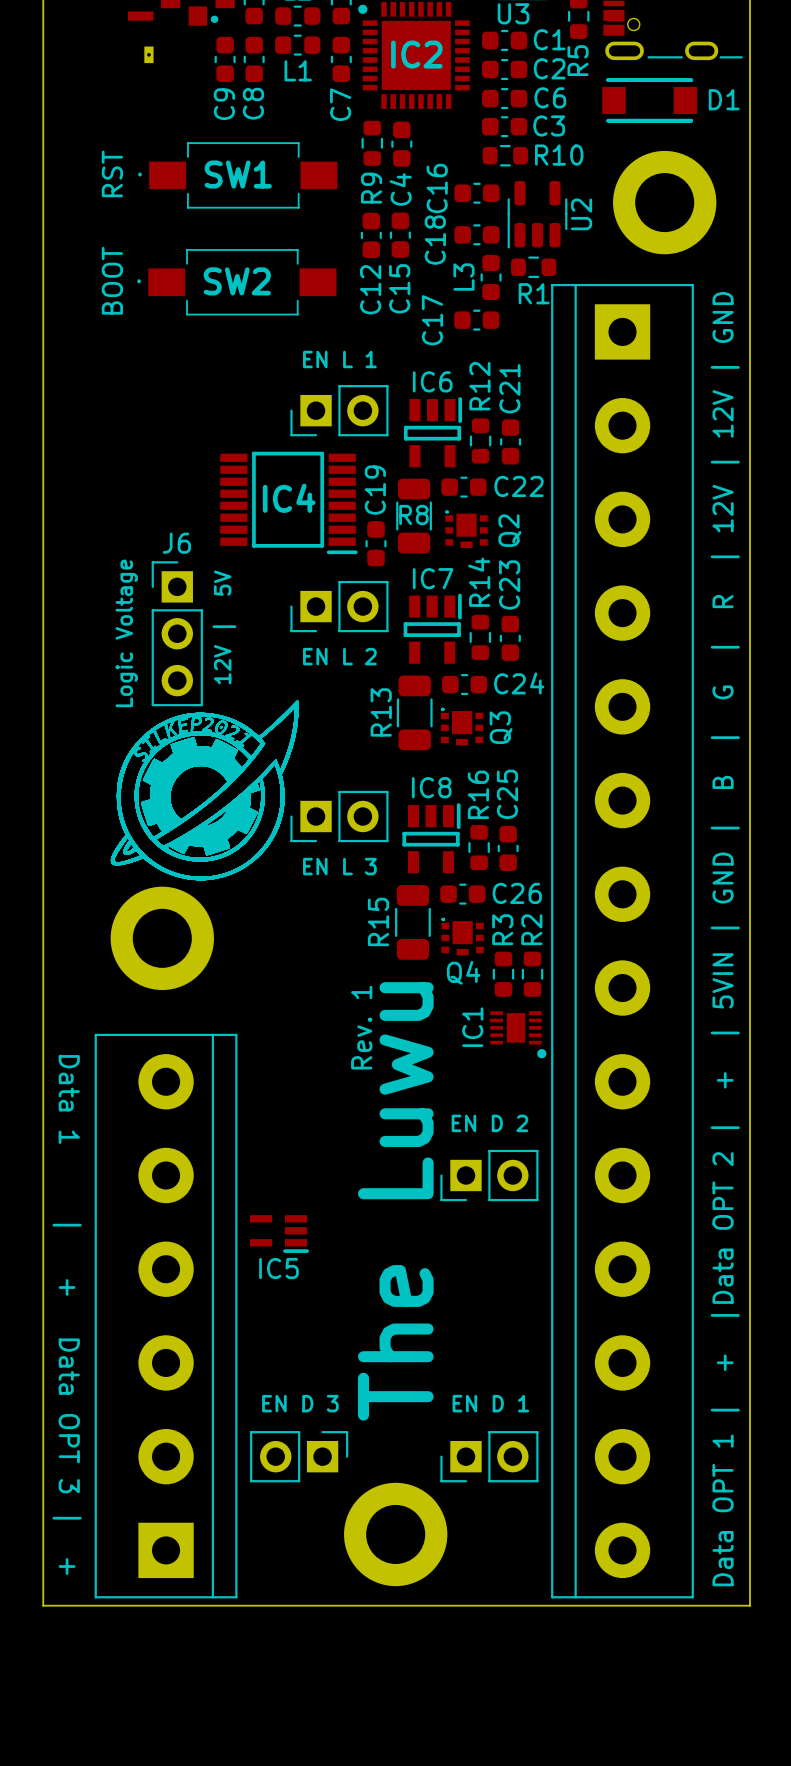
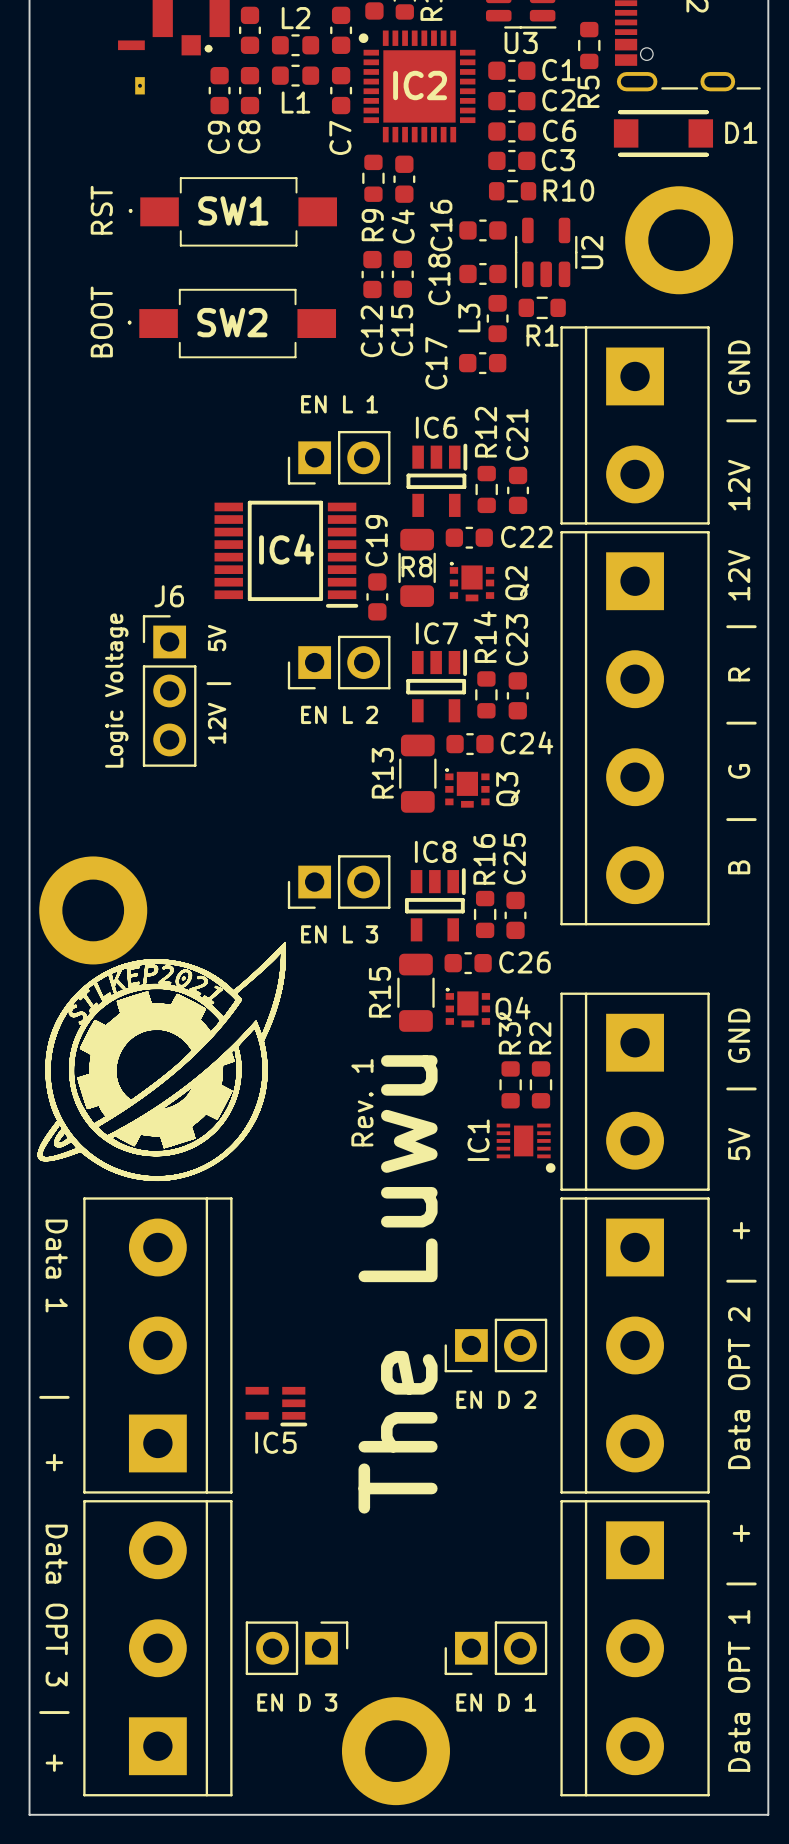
part: none -> (635, 425)
text: none -> 12V | GND (741, 425)
text: none -> B | G | R | 12V (741, 712)
part: none -> (635, 728)
drawing: [110, 699, 299, 881] -> none
drawing: none -> [37, 941, 286, 1182]
part position: (162, 938) -> (93, 910)
text: Data OPT 1 | + |Data OPT 2 | + | 5VIN | GND | B | G | R | 12V | 12V | GND (725, 939) -> none
part: (622, 941) -> none
Q4 name position: Q4 (463, 972) -> Q4 (513, 1009)
R3 position: (503, 974) -> (510, 1084)
R2 position: (532, 974) -> (540, 1084)
text: none -> 5V | GND (741, 1084)
part: none -> (635, 1091)
IC1 position: (518, 1034) -> (526, 1148)
text position: EN D 2 (489, 1123) -> EN D 2 (496, 1399)
text position: Data 1 | + (67, 1175) -> Data 1 | + (54, 1345)
part position: (489, 1175) -> (495, 1345)
IC5 position: (279, 1234) -> (276, 1406)
part: none -> (157, 1345)
part: none -> (635, 1345)
text: none -> Data OPT 2 | + (741, 1345)
part: (166, 1316) -> none
text position: EN D 3 (300, 1403) -> EN D 3 (297, 1702)
text position: EN D 1 (490, 1403) -> EN D 1 (496, 1702)
text position: Data OPT 3 | + (67, 1456) -> Data OPT 3 | + (54, 1648)
part position: (299, 1456) -> (297, 1648)
part position: (489, 1456) -> (495, 1648)
part position: (395, 1534) -> (395, 1751)
part: none -> (157, 1648)
part: none -> (635, 1648)
text: none -> Data OPT 1 | + (741, 1648)
board edge: (43, 1605) (749, 1605) -> (29, 1707) (29, 1814) (768, 1814) (768, 1707)

